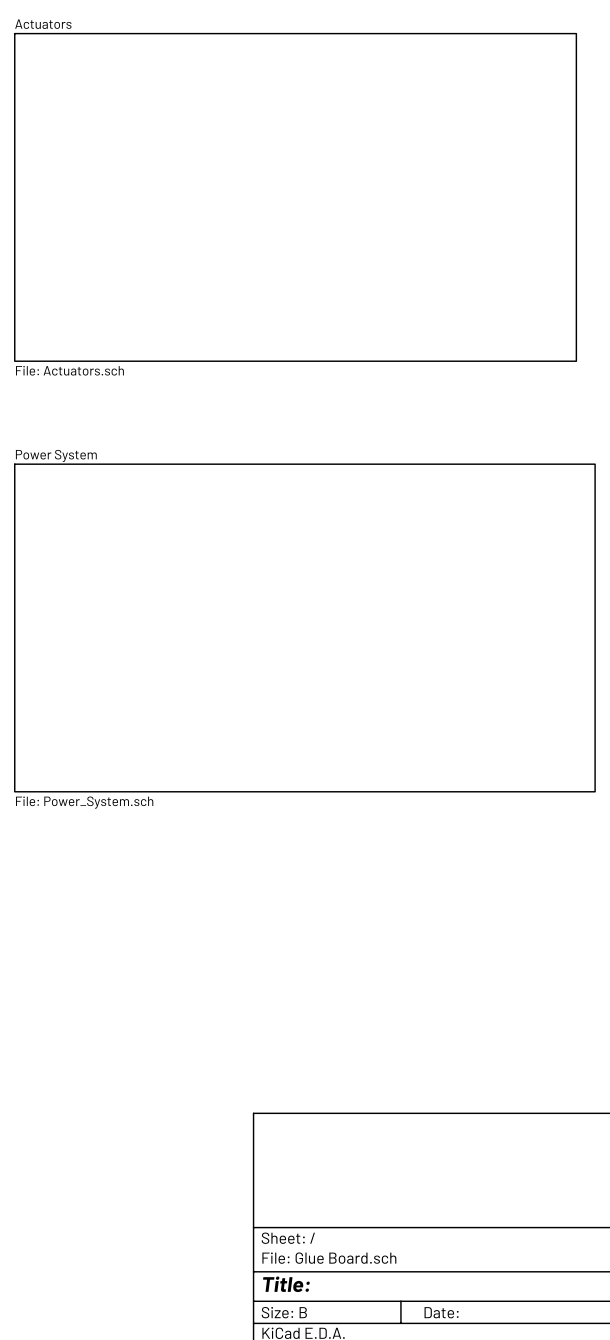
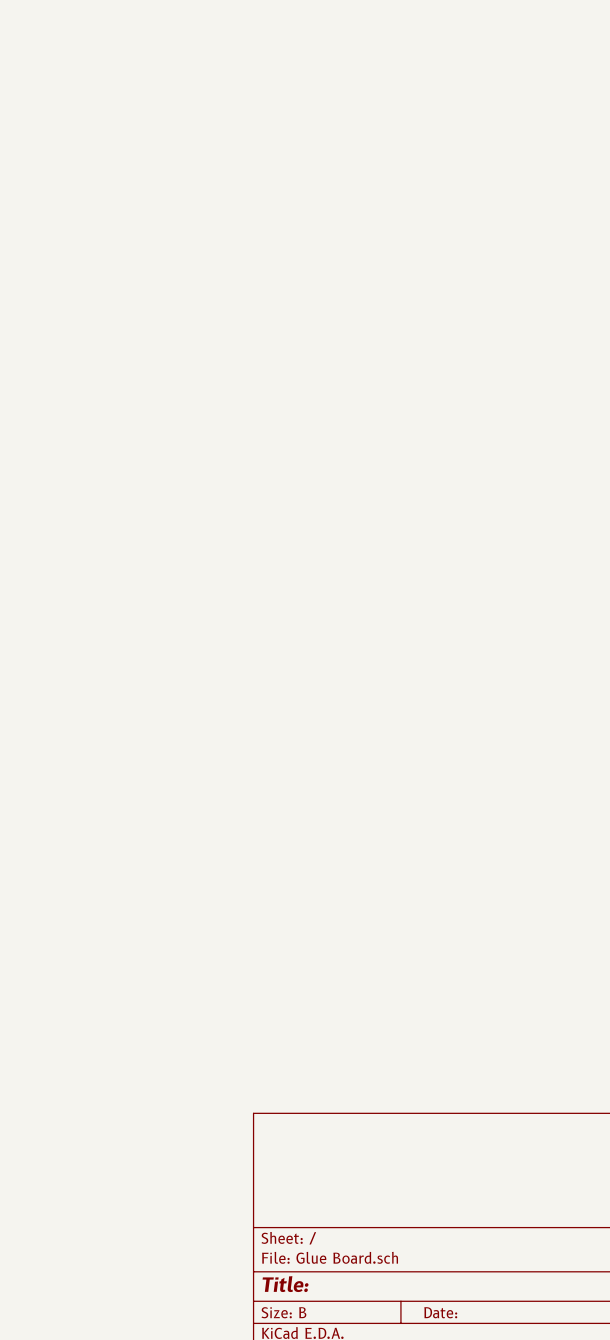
sheet Actuators: File: Actuators.sch (295, 197) -> none
sheet Power System: File: Power_System.sch (304, 627) -> none

